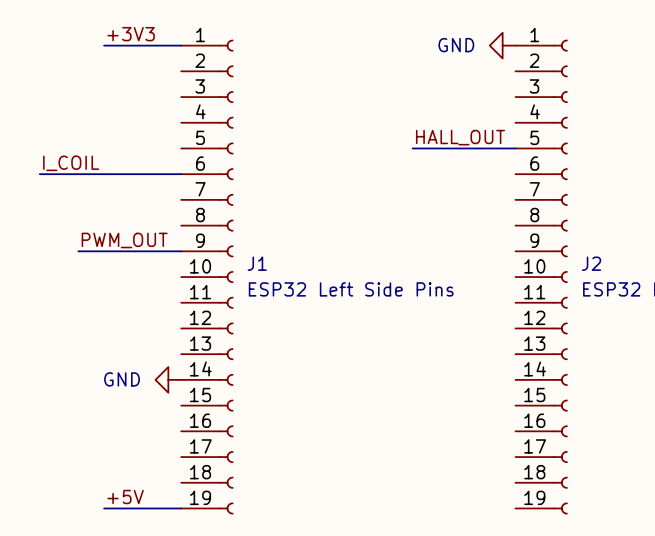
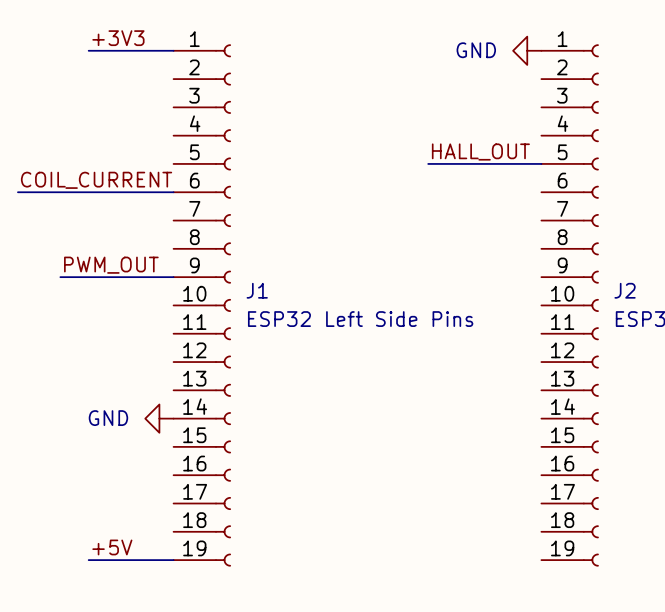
label: I_COIL (71, 163) -> COIL_CURRENT (96, 180)

